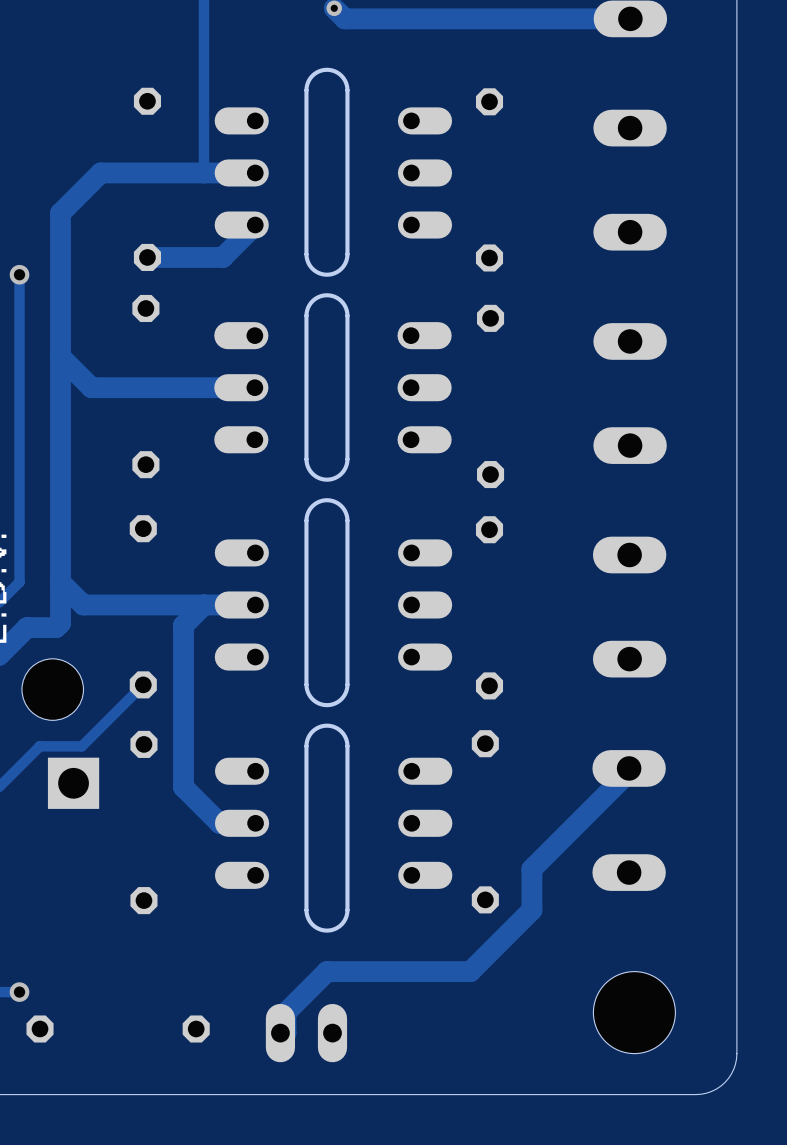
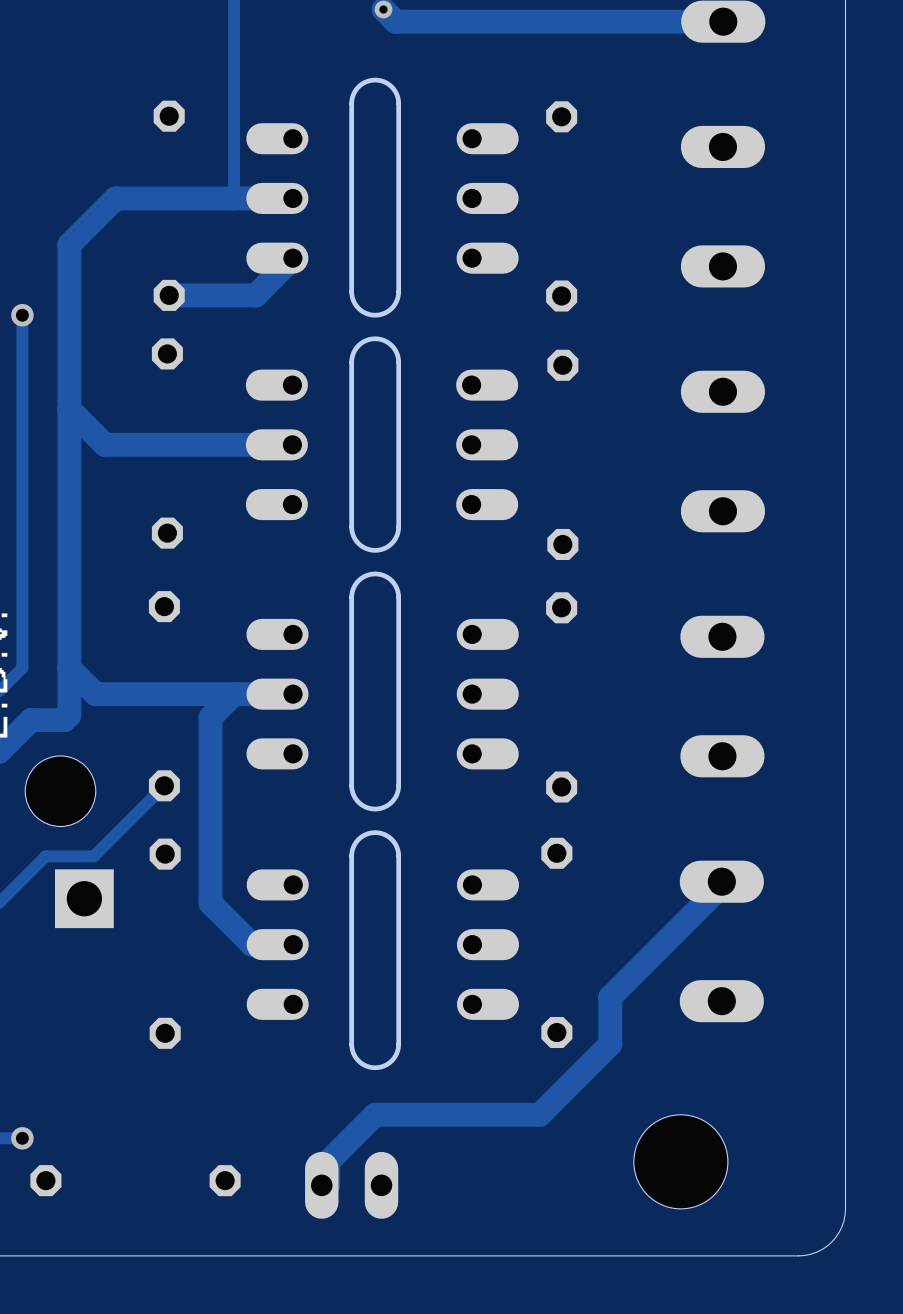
hole position: (634, 1012) -> (680, 1161)

